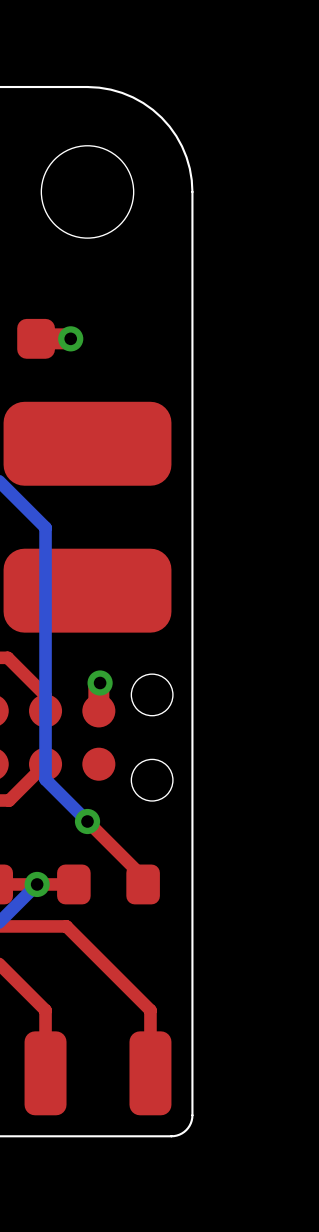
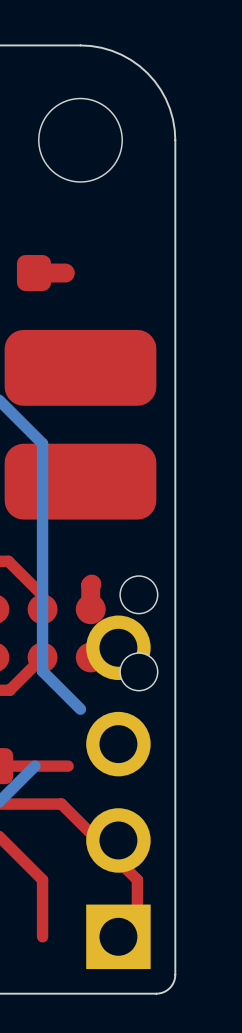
via: (70, 338) -> none
part position: (87, 590) -> (80, 481)
via: (100, 683) -> none
top track: (87, 821) (143, 877) (143, 884) -> none
via: (87, 821) -> none
part footprint: [57, 864, 160, 905] -> [86, 615, 151, 970]
via: (37, 884) -> none
part: (45, 1073) -> none
part: (150, 1073) -> none

